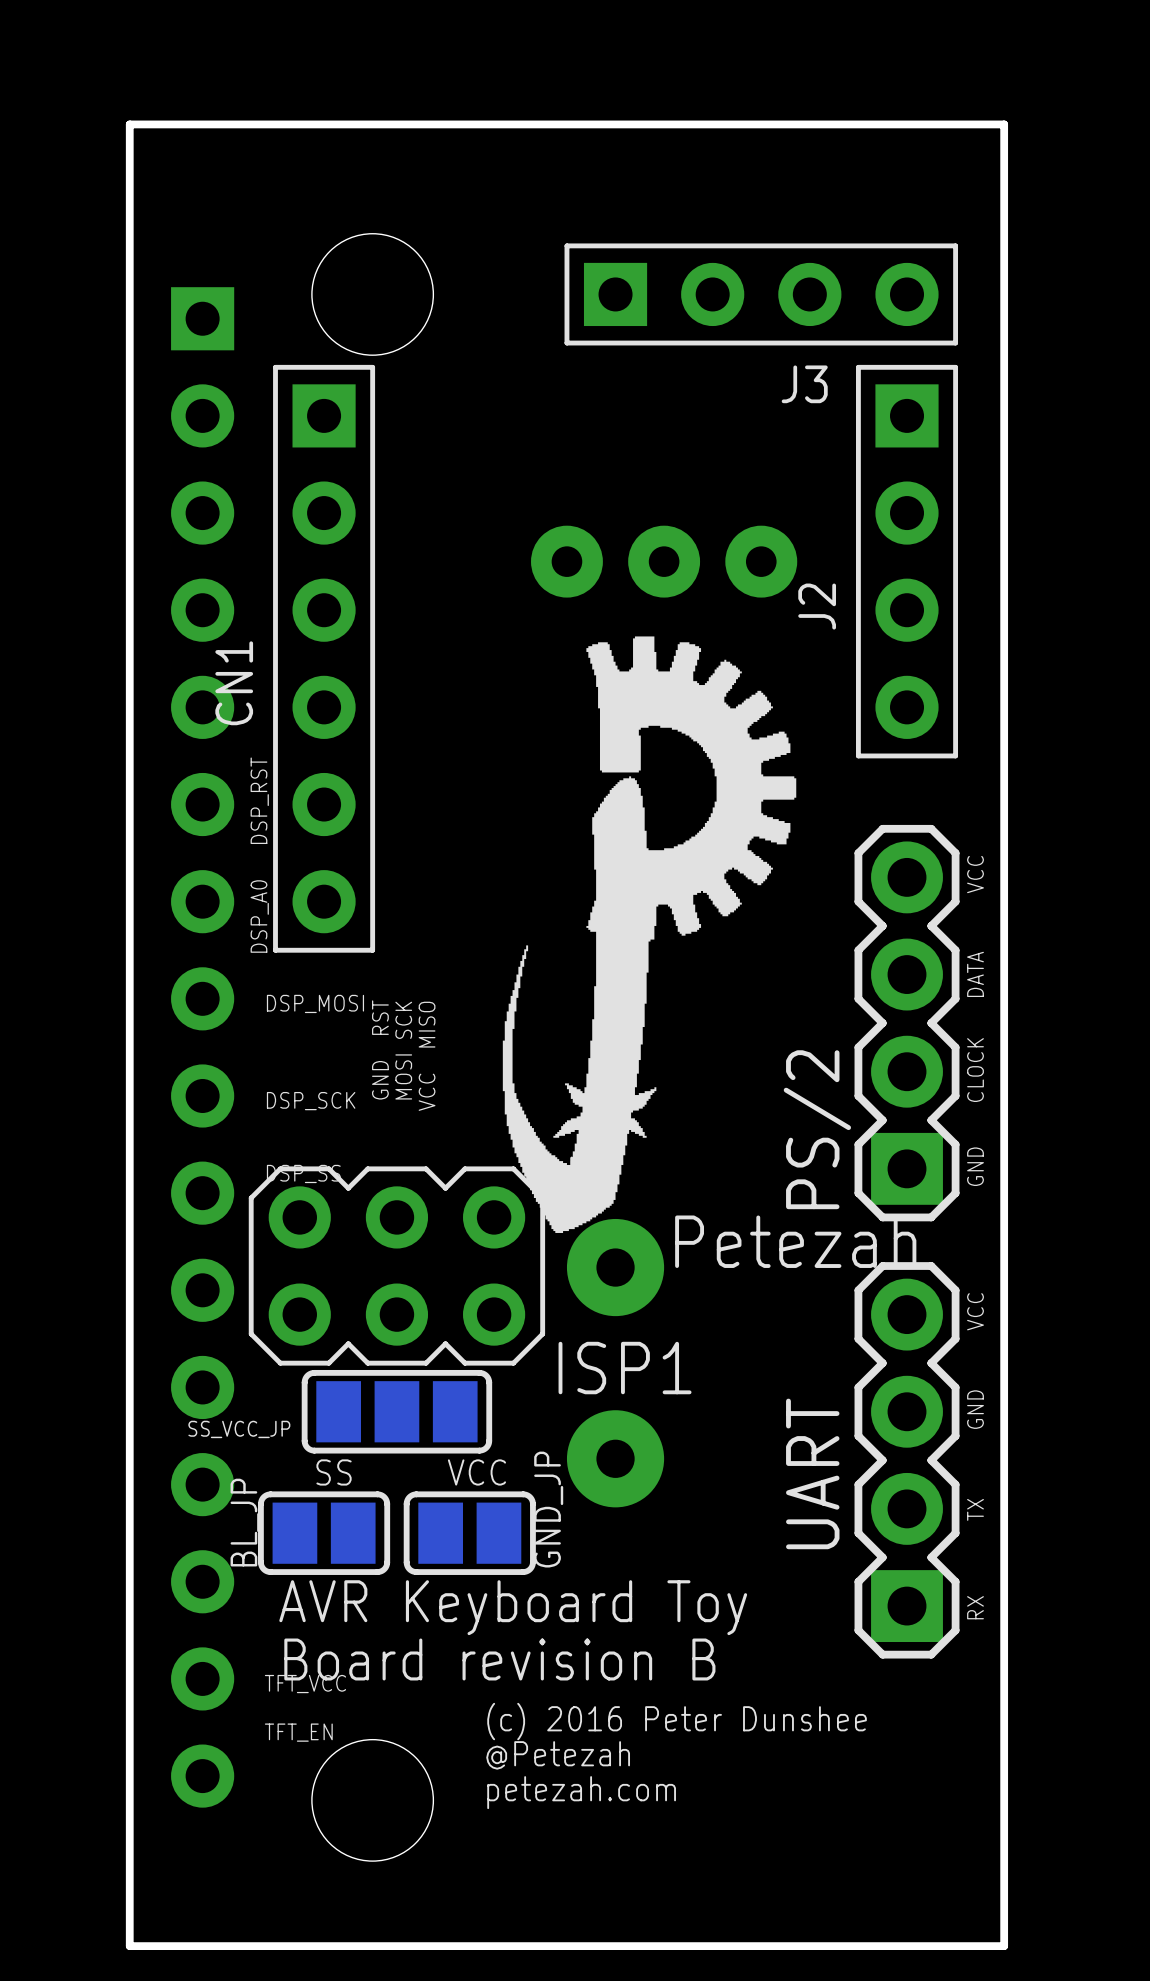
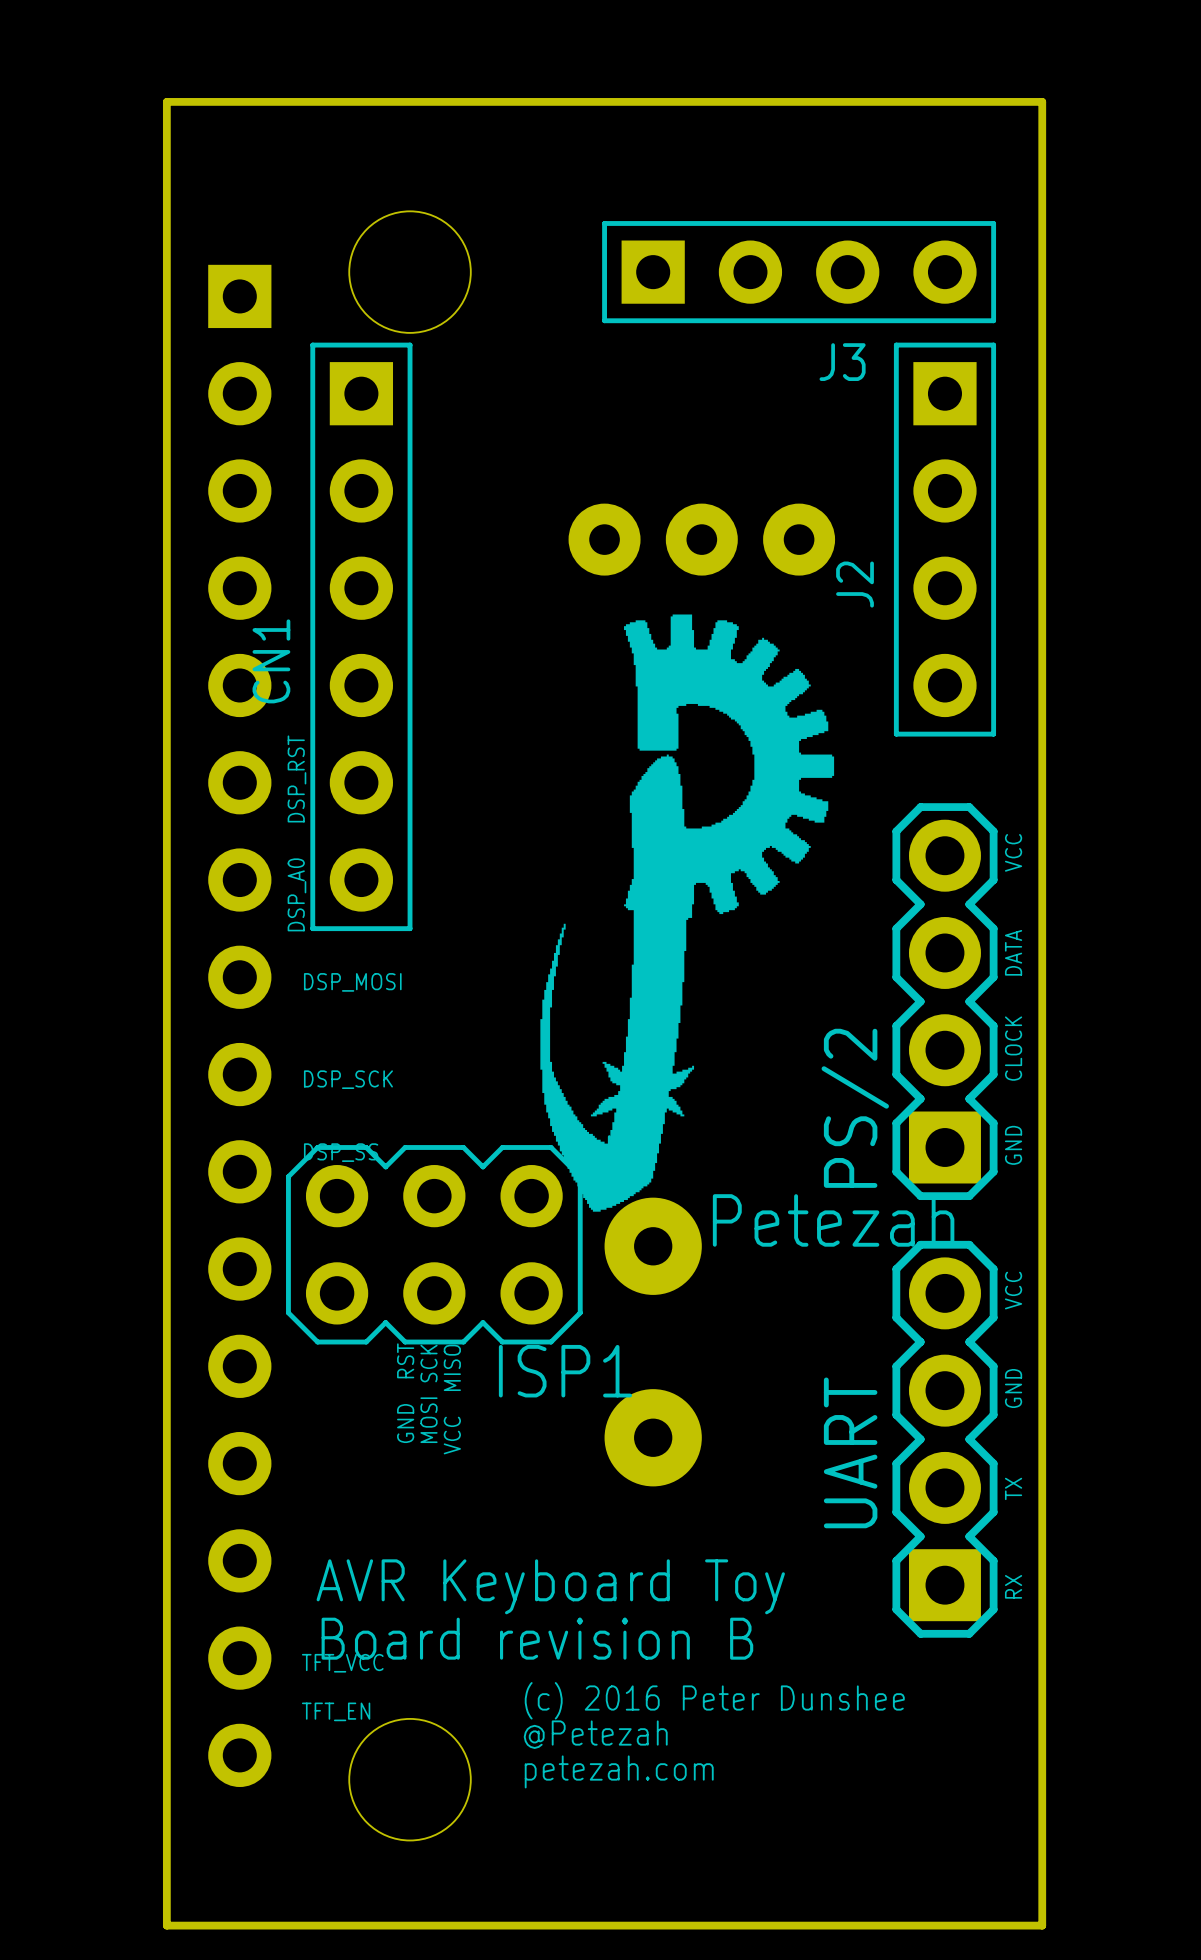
text position: GND RST (380, 1049) -> GND RST (405, 1393)
text position: MOSI SCK (403, 1050) -> MOSI SCK (428, 1393)
text position: VCC MISO (427, 1056) -> VCC MISO (452, 1399)
ISP1 name position: ISP1 (625, 1368) -> ISP1 (565, 1371)
SS_VCC_JP: (396, 1411) -> none
text: SS (334, 1472) -> none
text: VCC (476, 1472) -> none
BL_JP: (324, 1533) -> none
GND_JP: (469, 1533) -> none

